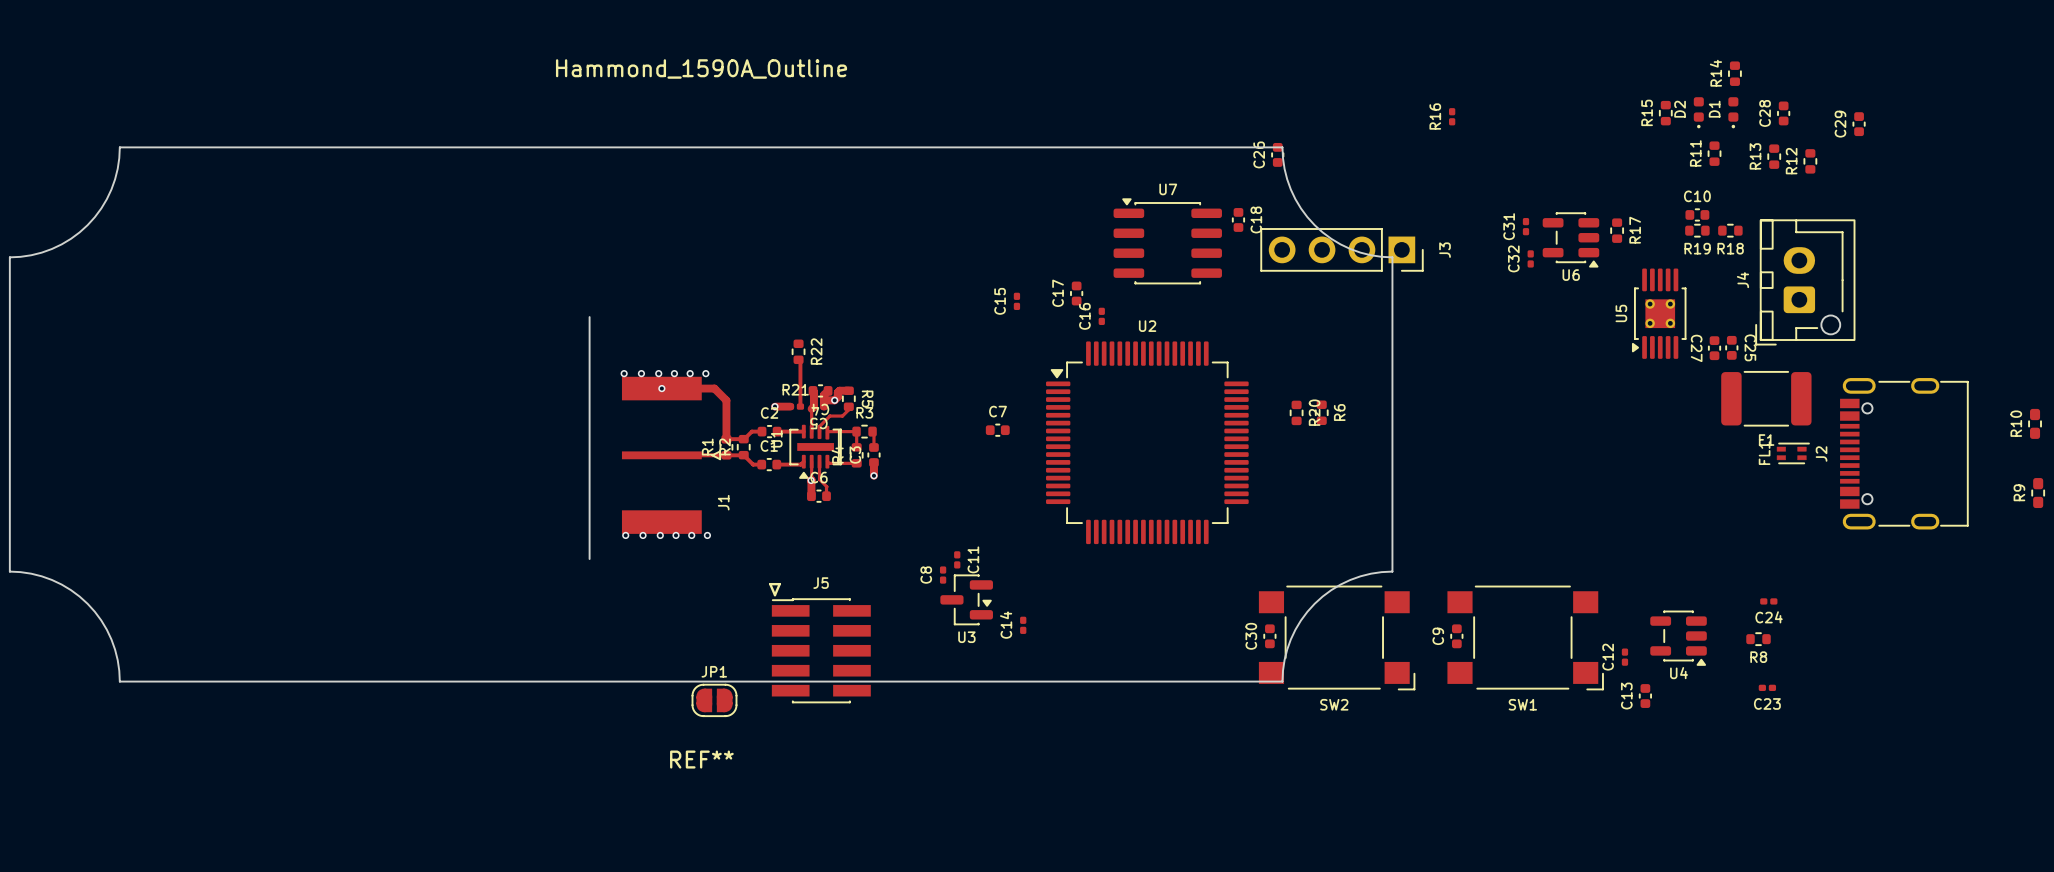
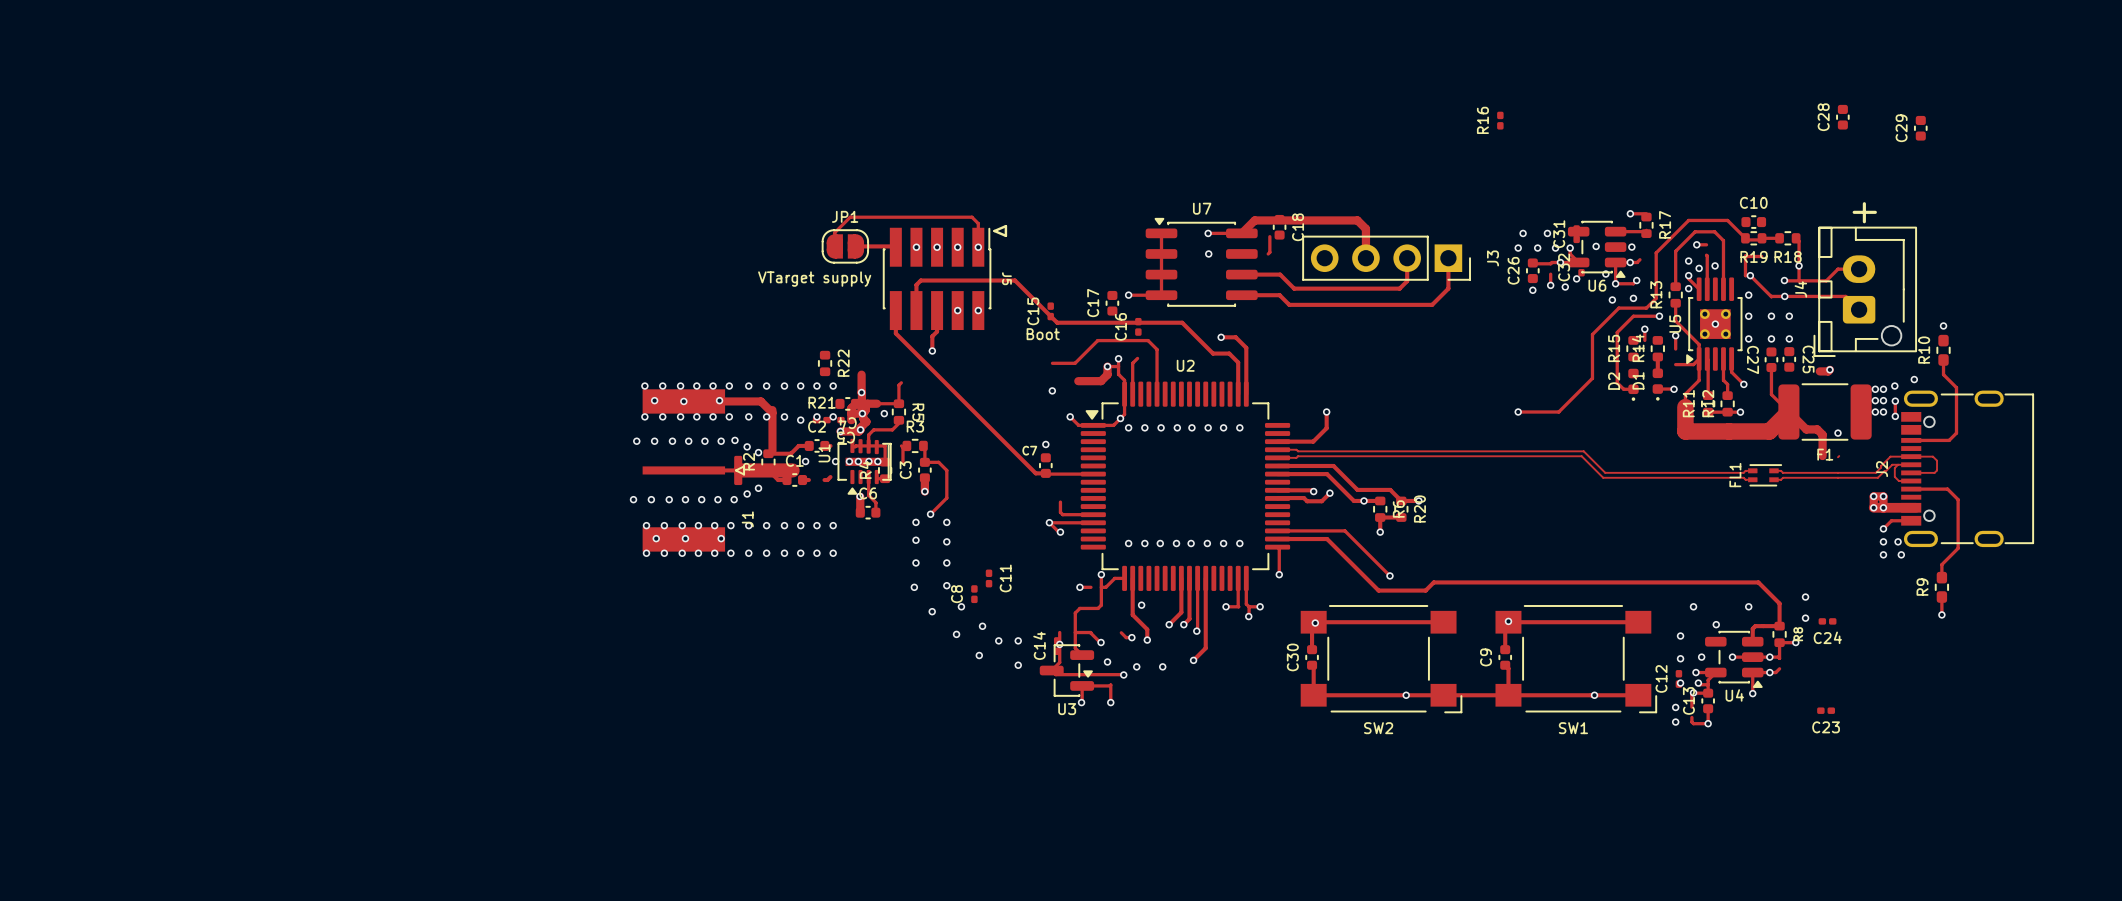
R14 position: (1734, 73) -> (1657, 348)
D2 position: (1698, 112) -> (1633, 384)
D1 position: (1733, 112) -> (1657, 384)
R15 position: (1665, 113) -> (1633, 348)
R11 position: (1714, 153) -> (1708, 403)
C26 position: (1277, 154) -> (1532, 270)
R13 position: (1774, 156) -> (1675, 294)
R12 position: (1810, 161) -> (1727, 403)
line: none -> (1864, 203) (1864, 221)
line: none -> (1854, 212) (1875, 212)
track: none -> (1630, 213) (1646, 213)
via: none -> (1630, 213)
line: none -> (1005, 226) (994, 231) (1005, 235) (1005, 226)
track: none -> (1646, 230) (1615, 231)
track: none -> (1161, 233) (1161, 295) (1128, 295)
track: none -> (1208, 233) (1241, 233)
via: none -> (1208, 233)
track: none -> (1241, 233) (1254, 220) (1357, 220) (1365, 228) (1365, 258)
via: none -> (1523, 233)
via: none -> (1547, 233)
track: none -> (1269, 236) (1268, 253)
R17 position: (1617, 230) -> (1646, 225)
track: none -> (1762, 238) (1779, 238)
track: none -> (1796, 238) (1799, 241) (1799, 280)
track: none -> (1761, 239) (1745, 240) (1727, 220) (1688, 220) (1656, 252) (1656, 298) (1646, 308) (1618, 308) (1592, 334) (1592, 378) (1558, 412) (1518, 412)
track: none -> (1696, 244) (1706, 244)
via: none -> (1696, 244)
track: none -> (834, 246) (834, 232) (850, 217) (971, 217) (978, 223) (978, 247)
track: none -> (855, 246) (895, 247)
via: none -> (1596, 246)
via: none -> (916, 247)
via: none -> (937, 247)
via: none -> (957, 247)
via: none -> (978, 247)
U6 position: (1570, 239) -> (1597, 249)
via: none -> (1631, 247)
via: none -> (1518, 248)
via: none -> (1537, 248)
via: none -> (1555, 248)
track: none -> (1570, 248) (1570, 253) (1578, 262) (1532, 262)
via: none -> (1570, 248)
U7 position: (1167, 241) -> (1201, 262)
via: none -> (1208, 253)
track: none -> (1706, 255) (1707, 289)
track: none -> (1761, 256) (1745, 256) (1745, 275) (1750, 275) (1771, 296) (1845, 296) (1859, 309)
track: none -> (1407, 258) (1407, 281) (1399, 288) (1294, 288) (1280, 274) (1241, 274)
track: none -> (1448, 258) (1448, 288) (1432, 304) (1289, 304) (1279, 295) (1241, 295)
track: none -> (1639, 259) (1637, 262) (1615, 262) (1615, 283) (1633, 283) (1636, 280)
via: none -> (1688, 261)
via: none -> (1560, 262)
via: none -> (1630, 262)
via: none -> (1715, 265)
via: none -> (1799, 265)
via: none -> (1699, 268)
track: none -> (1859, 269) (1838, 269) (1826, 280) (1784, 280)
track: none -> (1550, 274) (1550, 285)
via: none -> (1605, 274)
track: none -> (1688, 275) (1688, 278) (1699, 289)
via: none -> (1688, 275)
via: none -> (1750, 275)
via: none -> (1576, 278)
text: none -> VTarget supply (814, 279)
via: none -> (1636, 280)
via: none -> (1784, 280)
via: none -> (1615, 283)
via: none -> (1550, 285)
via: none -> (1565, 287)
track: none -> (1675, 286) (1675, 251) (1695, 231) (1714, 231) (1723, 240) (1723, 289)
via: none -> (1688, 288)
via: none -> (1532, 290)
via: none -> (1128, 295)
via: none -> (1748, 295)
via: none -> (1784, 296)
via: none -> (1633, 298)
via: none -> (1612, 300)
track: none -> (1675, 303) (1675, 321) (1699, 344) (1699, 380) (1685, 394) (1685, 431) (1769, 431) (1788, 412)
track: none -> (895, 310) (895, 333) (1035, 473) (1093, 474)
track: none -> (916, 310) (916, 284) (920, 280) (1014, 280) (1057, 322) (1182, 322) (1213, 353) (1229, 353) (1238, 362) (1238, 394)
track: none -> (937, 310) (937, 331) (932, 336) (932, 350)
via: none -> (957, 310)
via: none -> (978, 310)
track: none -> (1659, 316) (1633, 316) (1617, 332) (1617, 382) (1623, 389) (1633, 389)
via: none -> (1659, 316)
via: none -> (1748, 316)
via: none -> (1771, 316)
via: none -> (1789, 316)
via: none -> (1715, 324)
via: none -> (1943, 325)
board edge: (589, 317) (589, 559) -> none
track: none -> (1644, 329) (1644, 340)
via: none -> (1644, 329)
text: none -> Boot (1043, 334)
track: none -> (1675, 335) (1675, 349)
via: none -> (1675, 335)
track: none -> (1221, 337) (1235, 337) (1246, 347) (1246, 394)
via: none -> (1221, 337)
via: none -> (1748, 338)
via: none -> (1771, 338)
via: none -> (1789, 338)
via: none -> (932, 350)
track: none -> (1657, 356) (1657, 373)
track: none -> (1118, 358) (1118, 374) (1124, 380) (1124, 414) (1113, 425) (1078, 425) (1070, 416)
track: none -> (1137, 358) (1132, 363) (1132, 394)
via: none -> (1118, 358)
track: none -> (1699, 359) (1693, 364) (1675, 364)
track: none -> (1707, 359) (1708, 395)
track: none -> (1723, 359) (1723, 380) (1727, 384) (1727, 395)
track: none -> (1731, 359) (1731, 372) (1743, 384)
track: none -> (1943, 360) (1943, 374) (1956, 387) (1956, 433) (1949, 440) (1916, 440)
track: none -> (1052, 363) (1075, 363) (1097, 340) (1148, 340) (1157, 349) (1157, 394)
via: none -> (1107, 366)
track: none -> (1118, 366) (1107, 366) (1107, 374) (1101, 381) (1078, 381)
track: none -> (1771, 367) (1771, 394) (1788, 412)
track: none -> (1829, 369) (1819, 371)
via: none -> (1829, 369)
track: (798, 359) (800, 361) (800, 406) -> none
track: none -> (861, 374) (861, 412) (863, 418) (866, 421) (858, 431) (840, 431)
via: none -> (1914, 379)
track: none -> (901, 382) (898, 385) (898, 403) (877, 403)
via: none -> (1743, 384)
via: none -> (748, 386)
via: none -> (766, 386)
via: none -> (784, 386)
via: none -> (800, 386)
via: none -> (816, 386)
via: none -> (833, 386)
via: none -> (1894, 386)
track: none -> (1657, 389) (1674, 389)
via: none -> (1674, 389)
via: none -> (1875, 389)
via: none -> (1883, 389)
via: none -> (1052, 390)
via: none -> (861, 392)
via: none -> (654, 400)
via: none -> (719, 400)
via: none -> (1875, 400)
via: none -> (1883, 400)
track: none -> (1894, 400) (1894, 416)
track: (714, 388) (726, 400) (726, 439) -> (738, 401) (760, 401) (772, 412)
via: none -> (1895, 401)
track: (813, 390) (811, 431) -> none
track: none -> (772, 410) (772, 450)
R5 position: (848, 398) -> (898, 412)
track: none -> (1326, 412) (1326, 428) (1313, 441) (1277, 441)
via: none -> (1326, 412)
via: none -> (1518, 412)
track: none -> (1708, 412) (1740, 412)
via: none -> (1740, 412)
track: none -> (1788, 412) (1806, 429) (1817, 429) (1822, 434) (1822, 456)
via: none -> (1875, 412)
via: none -> (1883, 412)
via: none -> (884, 413)
via: none -> (1895, 416)
via: none -> (644, 416)
via: none -> (662, 416)
via: none -> (680, 416)
via: none -> (696, 416)
via: none -> (713, 416)
via: none -> (729, 416)
via: none -> (748, 416)
via: none -> (766, 416)
via: none -> (784, 416)
via: none -> (816, 416)
via: none -> (833, 416)
via: none -> (1070, 416)
via: none -> (1120, 418)
track: (774, 406) (790, 406) -> none
track: (848, 406) (848, 409) (842, 416) (829, 416) (819, 426) (819, 432) -> none
track: none -> (898, 423) (892, 429) (873, 429) (868, 434) (868, 446)
R20 position: (1296, 412) -> (1401, 509)
R6 position: (1321, 412) -> (1380, 509)
REF**: Hammond_1590A_Outline (701, 414) -> none
via: none -> (1128, 427)
via: none -> (1144, 427)
via: none -> (1161, 427)
via: none -> (1177, 427)
via: none -> (1191, 427)
via: none -> (1208, 427)
via: none -> (1223, 427)
via: none -> (1239, 427)
via: none -> (860, 429)
via: none -> (840, 431)
via: none -> (1838, 433)
R10 position: (2035, 423) -> (1943, 350)
via: none -> (734, 440)
via: none -> (636, 441)
via: none -> (654, 441)
via: none -> (672, 441)
via: none -> (688, 441)
via: none -> (704, 441)
via: none -> (721, 441)
C7 rotation: 0° (997, 430) -> 90° clockwise (1045, 465)
C7 position: (997, 430) -> (1045, 465)
via: none -> (1045, 444)
track: (762, 431) (751, 431) (744, 439) (726, 439) -> none
C2 position: (769, 431) -> (817, 445)
track: none -> (802, 445) (798, 445) (790, 454) (772, 453)
track: (783, 431) (798, 431) -> none
R3 position: (864, 431) -> (915, 445)
via: none -> (747, 446)
track: none -> (924, 447) (924, 462) (938, 462) (946, 470) (946, 498) (930, 514)
track: none -> (1277, 449) (1583, 451) (1605, 472) (1743, 472) (1745, 470) (1752, 470)
via: none -> (758, 452)
drawing: none -> [734, 455, 743, 486]
track: none -> (1839, 456) (1838, 457)
U2 position: (1147, 442) -> (1185, 486)
track: none -> (1277, 457) (1581, 456) (1603, 477) (1743, 477) (1745, 479) (1752, 479)
via: none -> (805, 461)
via: none -> (835, 461)
via: none -> (849, 461)
via: none -> (858, 461)
via: none -> (868, 461)
via: none -> (877, 461)
R1: (726, 447) -> none
track: none -> (1898, 464) (1894, 468) (1894, 476) (1898, 480) (1916, 480)
track: none -> (1916, 464) (1892, 464) (1877, 477) (1783, 477) (1781, 479) (1773, 479)
U1 position: (815, 451) -> (864, 466)
track: none -> (1277, 465) (1333, 465) (1357, 489) (1390, 489) (1401, 500) (1419, 501)
FL1 position: (1793, 453) -> (1765, 475)
track: none -> (740, 470) (792, 470)
C3 position: (873, 455) -> (924, 470)
track: none -> (1773, 470) (1781, 470) (1783, 472) (1875, 472) (1890, 456) (1932, 456) (1937, 460) (1937, 470) (1934, 472) (1916, 472)
track: none -> (1277, 474) (1327, 474) (1353, 500) (1380, 500)
track: (811, 461) (811, 496) -> none
track: (819, 461) (819, 479) (826, 486) (826, 496) -> none
track: (827, 461) (829, 463) (850, 463) -> none
track: none -> (868, 477) (868, 495) (876, 502)
track: (873, 462) (873, 475) -> (924, 477) (924, 491)
track: (782, 464) (798, 464) -> none
via: none -> (758, 488)
track: none -> (1916, 489) (1947, 489) (1958, 499) (1958, 548) (1941, 564) (1941, 577)
track: none -> (1277, 490) (1313, 491)
via: (873, 475) -> none
via: none -> (924, 491)
via: none -> (1313, 491)
track: none -> (1329, 493) (1321, 501) (1307, 501) (1303, 498) (1277, 498)
via: none -> (1329, 493)
via: none -> (747, 493)
via: (811, 480) -> none
track: none -> (860, 496) (860, 512)
via: none -> (859, 496)
via: none -> (1873, 496)
via: none -> (1883, 496)
via: none -> (633, 499)
via: none -> (651, 499)
via: none -> (669, 499)
via: none -> (685, 499)
via: none -> (701, 499)
via: none -> (717, 499)
via: none -> (734, 499)
via: none -> (1364, 500)
via: none -> (1418, 500)
track: none -> (1060, 502) (1060, 512) (1062, 514) (1093, 514)
track: none -> (875, 503) (875, 512)
via: none -> (1873, 507)
track: none -> (1883, 507) (1883, 496) (1873, 496) (1873, 507) (1916, 507)
via: none -> (1883, 507)
R9 position: (2038, 493) -> (1941, 587)
C6 position: (818, 496) -> (868, 512)
via: none -> (930, 514)
track: none -> (1401, 517) (1380, 517) (1380, 532)
track: none -> (1916, 520) (1891, 520) (1883, 528)
via: none -> (915, 522)
via: none -> (946, 522)
track: none -> (1049, 522) (1093, 522)
track: none -> (1049, 522) (1060, 532)
via: none -> (1049, 522)
via: none -> (646, 525)
via: none -> (664, 525)
via: none -> (682, 525)
via: none -> (698, 525)
via: none -> (714, 525)
via: none -> (730, 525)
via: none -> (748, 525)
via: none -> (766, 525)
via: none -> (784, 525)
via: none -> (800, 525)
via: none -> (816, 525)
via: none -> (833, 525)
via: none -> (1883, 528)
track: none -> (1277, 530) (1344, 530) (1389, 575)
via: none -> (1060, 532)
via: none -> (1380, 532)
via: none -> (656, 538)
via: none -> (685, 538)
via: none -> (721, 538)
track: none -> (1277, 539) (1327, 539) (1378, 590) (1425, 590) (1433, 582) (1758, 582) (1779, 603) (1779, 626) (1755, 626) (1752, 628) (1752, 641)
via: none -> (915, 540)
via: none -> (946, 541)
via: none -> (1883, 541)
via: none -> (1898, 541)
via: none -> (1128, 543)
via: none -> (1144, 543)
via: none -> (1160, 543)
via: none -> (1176, 543)
via: none -> (1191, 543)
via: none -> (1207, 543)
via: none -> (1223, 543)
via: none -> (1239, 543)
track: none -> (1277, 547) (1279, 548) (1279, 574)
via: none -> (748, 553)
via: none -> (766, 553)
via: none -> (784, 553)
via: none -> (800, 553)
via: none -> (816, 553)
via: none -> (833, 553)
via: none -> (1883, 554)
via: none -> (1901, 554)
via: none -> (915, 562)
via: none -> (946, 562)
track: none -> (1101, 574) (1101, 605) (1098, 608) (1079, 608) (1075, 613) (1075, 648) (1082, 655)
via: none -> (1101, 574)
via: none -> (1279, 574)
via: none -> (1389, 575)
track: none -> (1124, 578) (1114, 578) (1105, 587) (1101, 587)
track: none -> (1132, 578) (1132, 614) (1147, 629) (1147, 640)
track: none -> (1181, 578) (1181, 612) (1169, 624)
track: none -> (1189, 578) (1189, 618) (1183, 624)
track: none -> (1197, 578) (1196, 631)
track: none -> (1205, 578) (1205, 648) (1193, 660)
track: none -> (1238, 578) (1238, 606) (1226, 606)
track: none -> (1246, 578) (1246, 604) (1249, 606)
via: none -> (946, 585)
via: none -> (914, 587)
track: none -> (1079, 587) (1090, 587)
via: none -> (1079, 587)
via: none -> (1805, 597)
track: none -> (1941, 597) (1941, 614)
line: (770, 584) (774, 595) (779, 584) (770, 584) -> none
via: none -> (1141, 605)
via: none -> (961, 606)
via: none -> (1226, 606)
track: none -> (1249, 606) (1248, 616)
track: none -> (1249, 606) (1260, 606)
via: none -> (1260, 606)
via: none -> (1693, 606)
via: none -> (1748, 606)
via: none -> (932, 611)
via: none -> (1941, 614)
via: none -> (1248, 616)
via: none -> (1805, 618)
U3 position: (966, 599) -> (1066, 670)
via: none -> (1508, 621)
track: none -> (1443, 622) (1313, 622) (1312, 623) (1312, 649)
track: none -> (1638, 622) (1508, 622) (1505, 625) (1505, 649)
via: none -> (1315, 623)
via: none -> (1169, 624)
via: none -> (1183, 624)
via: none -> (1716, 624)
via: none -> (982, 626)
via: none -> (1196, 631)
track: none -> (1059, 632) (1059, 662) (1051, 670) (1055, 674) (1123, 674)
track: none -> (1075, 632) (1090, 632)
track: none -> (1090, 632) (1101, 642)
track: none -> (1121, 632) (1126, 637) (1131, 637)
via: none -> (956, 634)
via: none -> (1680, 636)
via: none -> (1131, 637)
via: none -> (1147, 640)
via: none -> (998, 640)
via: none -> (1018, 640)
via: none -> (1101, 642)
via: none -> (1795, 642)
track: none -> (1795, 642) (1779, 642) (1779, 658) (1732, 657)
via: none -> (1059, 644)
via: none -> (979, 655)
via: none -> (1701, 657)
via: none -> (1732, 657)
via: none -> (1769, 657)
via: none -> (1680, 658)
via: none -> (1193, 660)
R8 rotation: 0° (1758, 639) -> 90° clockwise (1779, 634)
R8 position: (1758, 639) -> (1779, 634)
via: none -> (1107, 661)
via: none -> (1018, 665)
track: none -> (1312, 665) (1313, 666) (1313, 695) (1638, 695)
track: none -> (1505, 665) (1508, 668) (1508, 695)
via: none -> (1136, 666)
via: none -> (1162, 666)
track: none -> (1779, 668) (1775, 672) (1752, 672) (1753, 694)
J5 rotation: 0° (821, 650) -> 90° clockwise (937, 278)
J5 position: (821, 650) -> (937, 278)
via: none -> (1695, 672)
via: none -> (1769, 672)
track: none -> (1695, 673) (1715, 672) (1708, 680) (1708, 693) (1691, 694) (1691, 707)
via: none -> (1123, 674)
via: none -> (1680, 683)
track: none -> (1698, 683) (1708, 684)
via: none -> (1698, 683)
via: none -> (1693, 692)
via: none -> (1752, 693)
via: none -> (1406, 695)
via: none -> (1594, 695)
track: none -> (1081, 702) (1082, 685) (1110, 685) (1110, 702)
via: none -> (1081, 702)
via: none -> (1110, 702)
via: none -> (1675, 707)
track: none -> (1708, 708) (1708, 723) (1693, 723) (1691, 717)
C13 position: (1645, 696) -> (1708, 700)
via: none -> (1675, 722)
JP1 position: (714, 700) -> (845, 246)
via: none -> (1708, 723)

